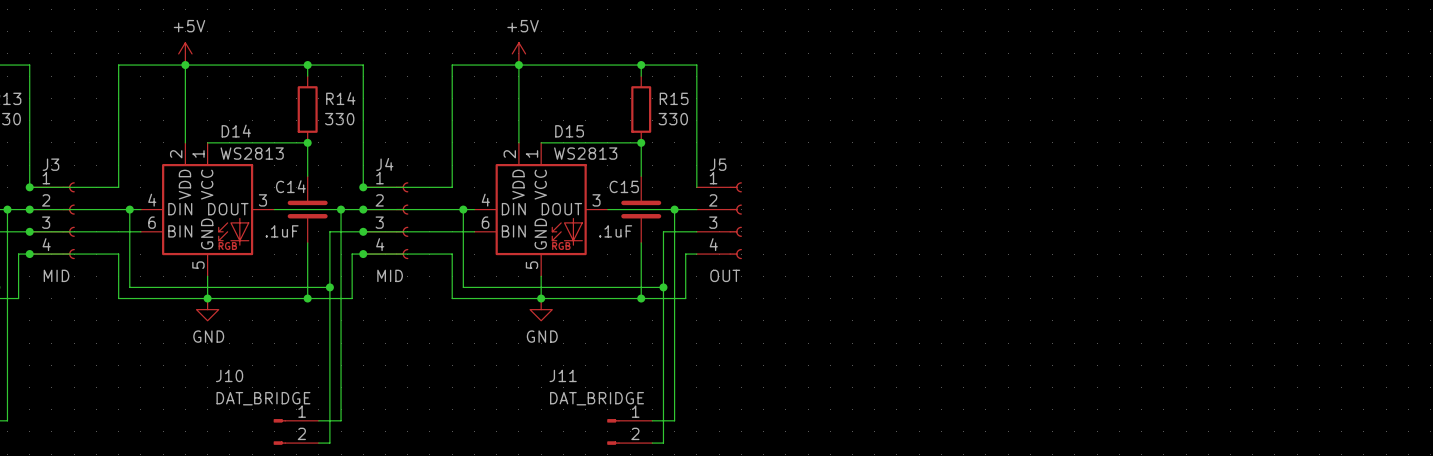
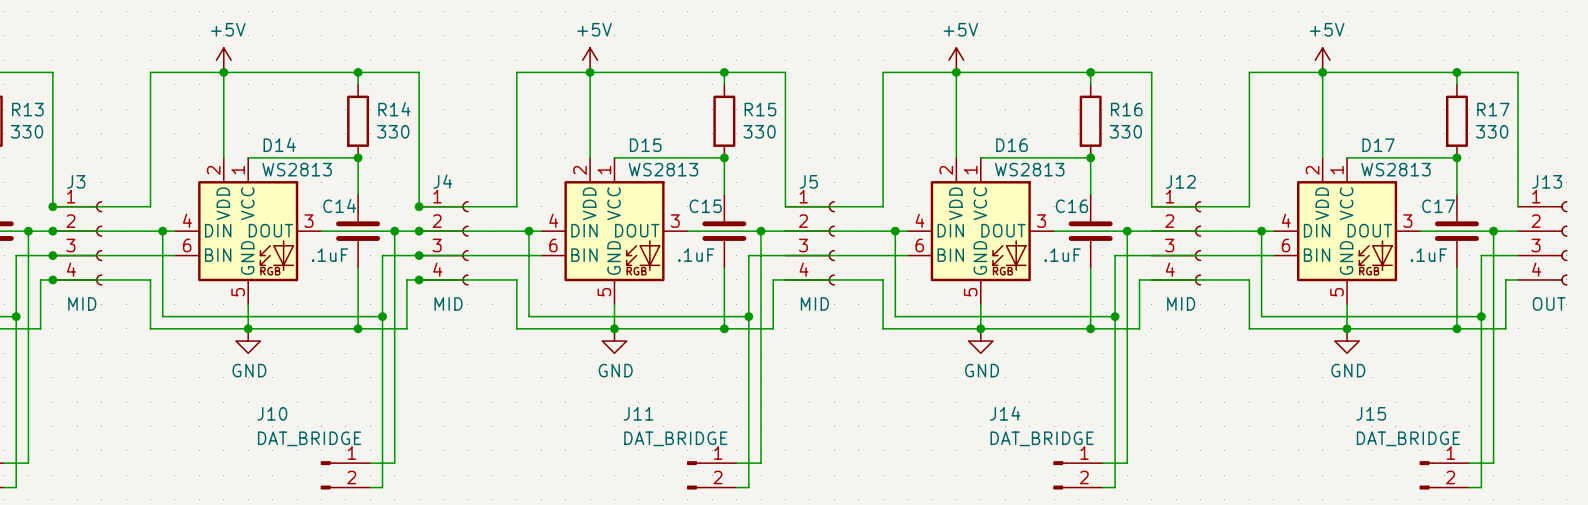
power symbol: none -> +5V (956, 60)
power symbol: none -> +5V (1322, 60)
wire: none -> (956, 72) (956, 157)
junction: none -> (956, 72)
wire: none -> (1090, 72) (1090, 84)
junction: none -> (1090, 72)
wire: none -> (1322, 72) (1322, 157)
junction: none -> (1322, 72)
wire: none -> (1456, 72) (1456, 84)
junction: none -> (1456, 72)
R16: none -> 330 (1090, 121)
R17: none -> 330 (1456, 121)
wire: none -> (980, 157) (1090, 157) (1090, 194)
junction: none -> (1090, 157)
wire: none -> (1347, 157) (1456, 157) (1456, 194)
junction: none -> (1456, 157)
wire: none -> (785, 206) (883, 206) (883, 72) (1151, 72) (1151, 206) (1249, 206) (1249, 72) (1518, 72) (1518, 206)
wire: none -> (785, 231) (907, 231)
wire: none -> (895, 231) (895, 316) (1115, 316)
junction: none -> (895, 231)
D16: none -> WS2813 (980, 231)
wire: none -> (1054, 231) (1273, 231)
C16: none -> .1uF (1090, 231)
wire: none -> (1127, 231) (1127, 463) (1102, 463)
junction: none -> (1127, 231)
wire: none -> (1261, 231) (1261, 316) (1481, 316)
junction: none -> (1261, 231)
D17: none -> WS2813 (1347, 231)
wire: none -> (1420, 231) (1518, 231)
C17: none -> .1uF (1456, 231)
wire: none -> (1493, 231) (1493, 463) (1469, 463)
junction: none -> (1493, 231)
J12: none -> MID (1176, 243)
J13: none -> OUT (1542, 243)
wire: none -> (785, 255) (907, 255)
wire: none -> (1273, 255) (1115, 255) (1115, 487) (1102, 487)
wire: none -> (1518, 255) (1481, 255) (1481, 487) (1469, 487)
wire: none -> (1090, 267) (1090, 328)
wire: none -> (1456, 267) (1456, 328)
wire: none -> (785, 279) (883, 279) (883, 328) (1139, 328) (1139, 279) (1249, 279) (1249, 328) (1505, 328) (1505, 279) (1518, 279)
J5 value: OUT (725, 275) -> MID (814, 303)
wire: none -> (980, 304) (980, 328)
wire: none -> (1347, 304) (1347, 328)
junction: none -> (1115, 316)
junction: none -> (1481, 316)
junction: none -> (980, 328)
junction: none -> (1090, 328)
junction: none -> (1347, 328)
junction: none -> (1456, 328)
power symbol: none -> GND (980, 341)
power symbol: none -> GND (1347, 341)
J14: none -> DAT_BRIDGE (1078, 475)
J15: none -> DAT_BRIDGE (1444, 475)

